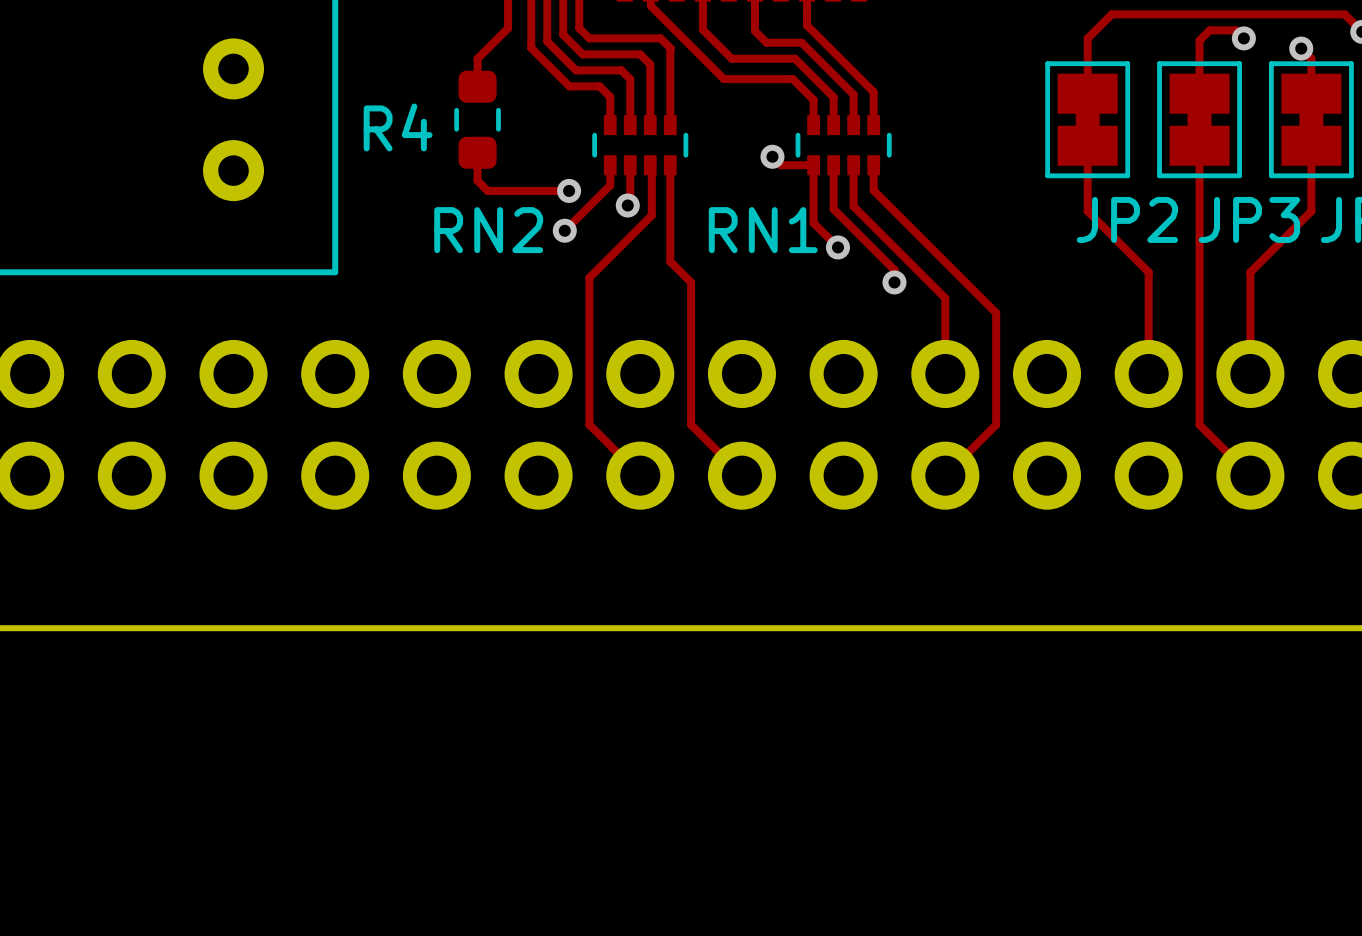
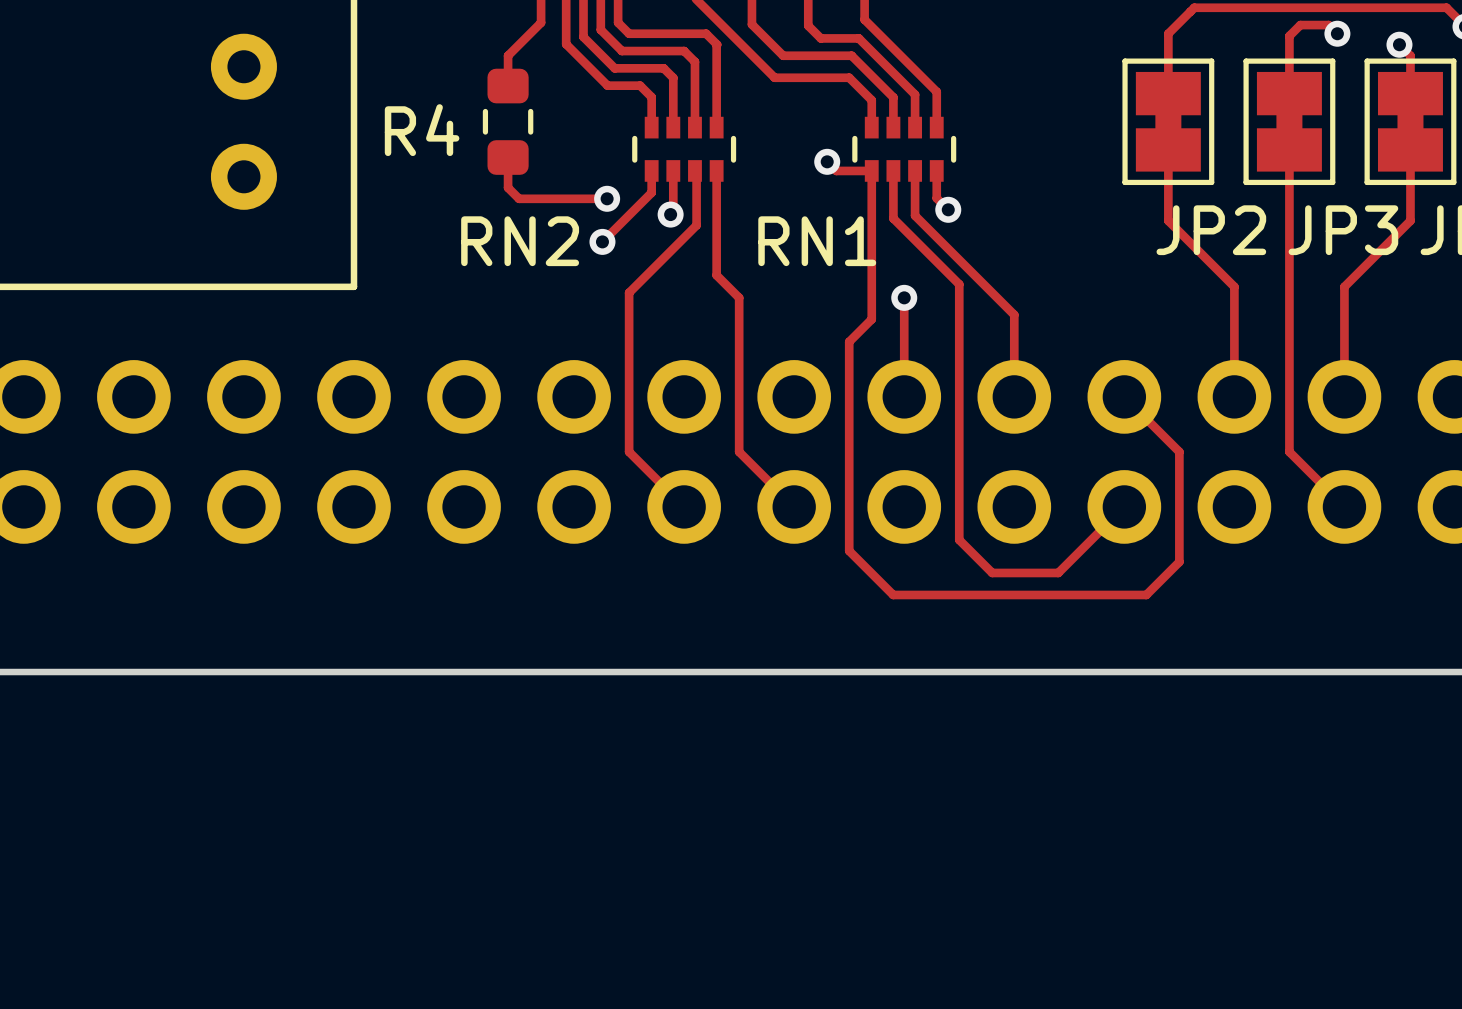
track: (884, 201) (996, 312) (996, 424) (945, 475) -> none
via: none -> (948, 209)
track: (813, 223) (837, 247) -> (871, 233) (871, 319) (849, 341) (849, 550) (893, 594) (1146, 594) (1179, 561) (1179, 451) (1124, 396)
via: (837, 247) -> none
track: none -> (904, 297) (904, 396)
via: none -> (904, 297)
track: none -> (959, 297) (959, 539) (992, 572) (1058, 572) (1124, 506)
via: (894, 282) -> none

